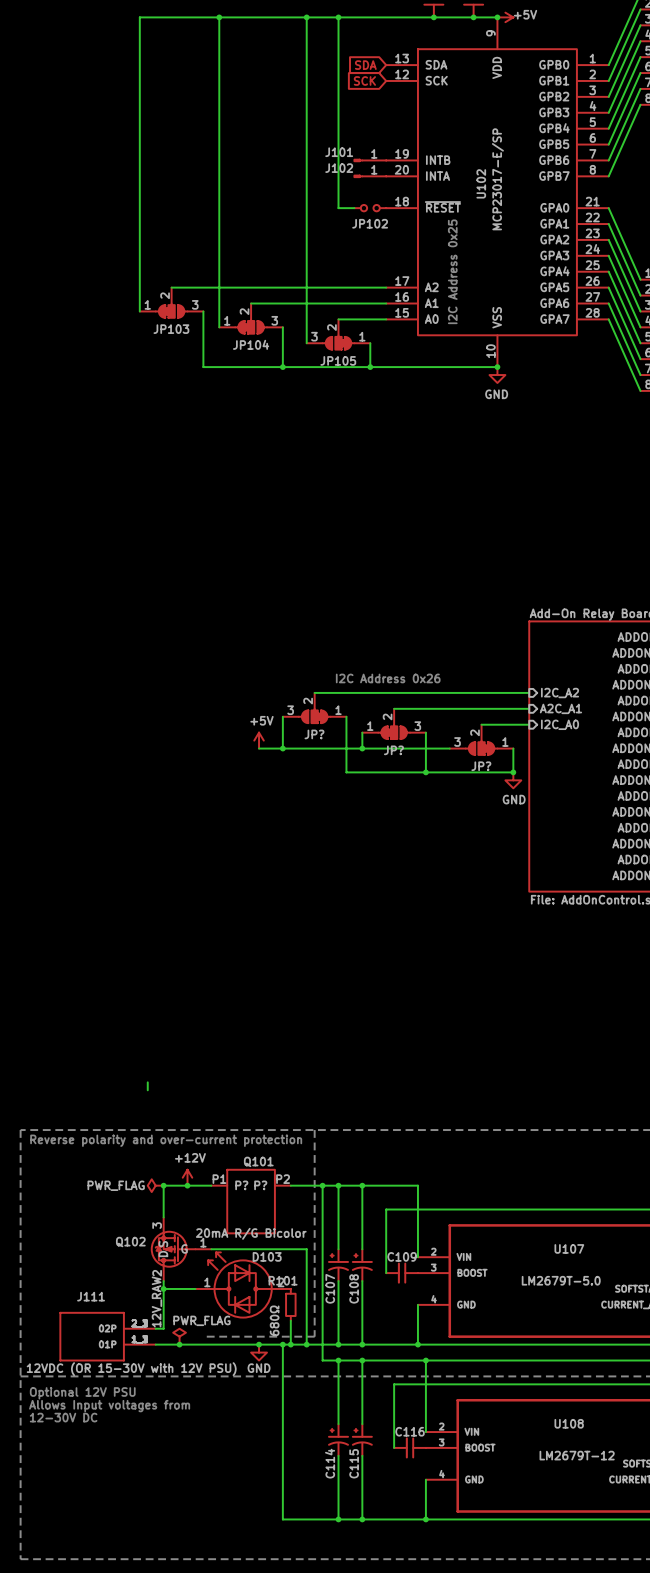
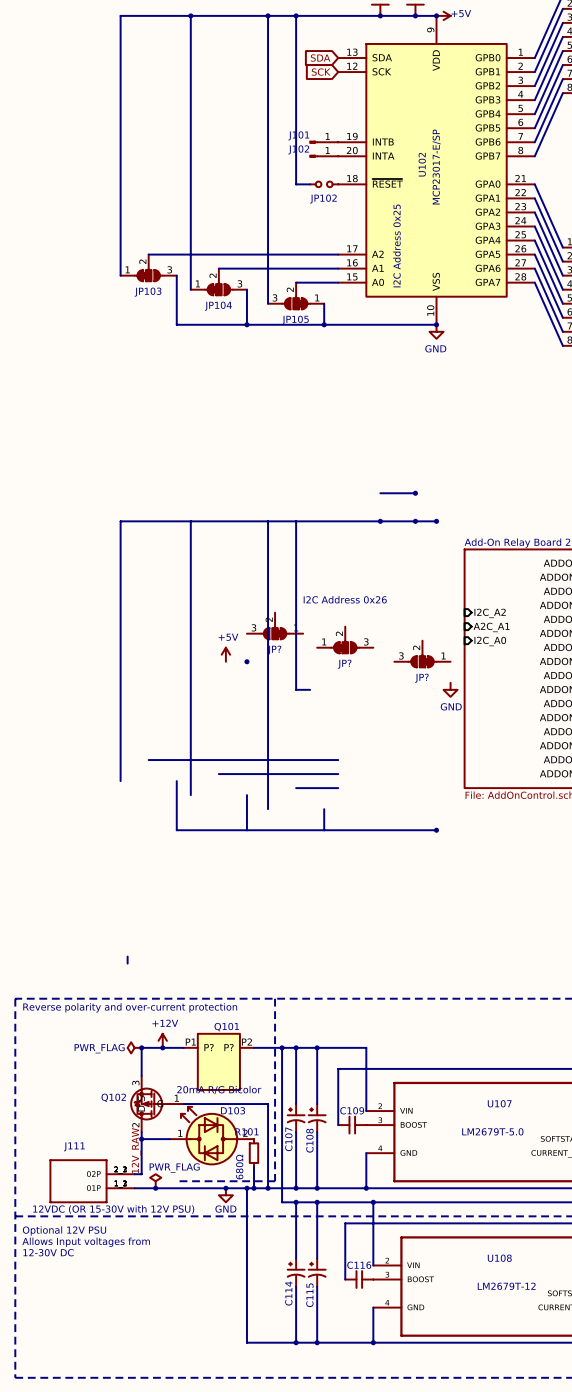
wire: none -> (380, 493) (415, 493)
junction: none -> (415, 493)
wire: none -> (190, 521) (190, 795)
wire: none -> (268, 521) (268, 809)
wire: none -> (296, 521) (296, 689) (310, 689)
junction: none -> (380, 521)
junction: none -> (415, 521)
wire: none -> (436, 521) (120, 521) (120, 781)
junction: none -> (436, 521)
wire: (314, 692) (529, 692) -> none
wire: (394, 708) (529, 708) -> none
wire: (282, 716) (282, 748) -> none
wire: (346, 716) (346, 772) (513, 772) (513, 748) -> none
wire: (481, 724) (529, 724) -> none
wire: (362, 732) (362, 748) -> none
wire: (425, 732) (425, 772) -> none
wire: (259, 748) (449, 748) -> none
junction: (362, 748) -> none
junction: (425, 772) -> none
junction: (513, 772) -> none
wire: none -> (148, 760) (338, 760)
wire: none -> (218, 774) (338, 774)
wire: none -> (176, 781) (176, 830) (436, 830)
wire: none -> (296, 788) (338, 788)
wire: none -> (246, 795) (246, 830)
wire: none -> (324, 809) (324, 830)
junction: none -> (436, 830)

